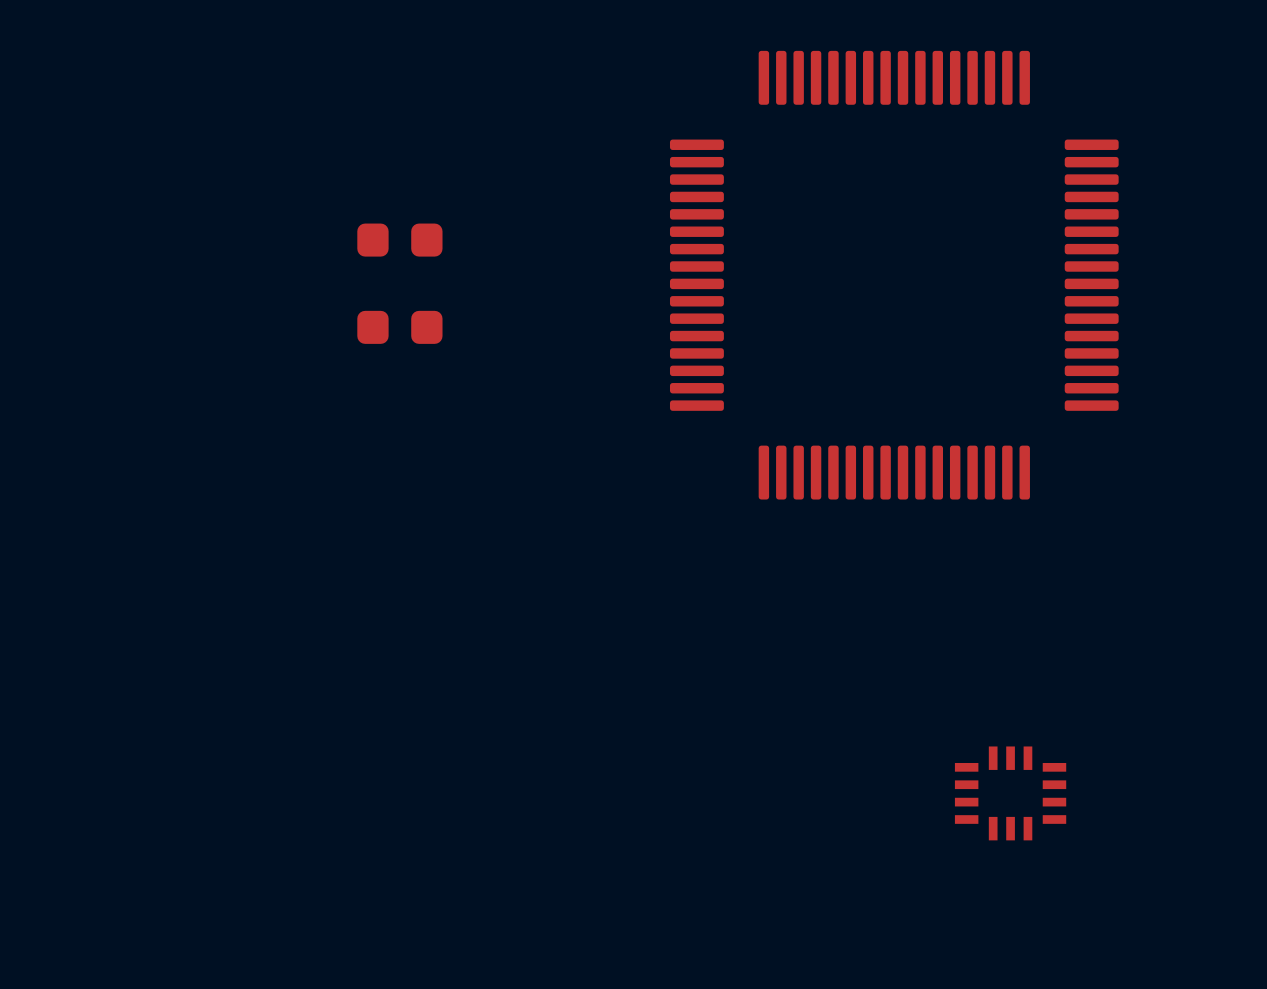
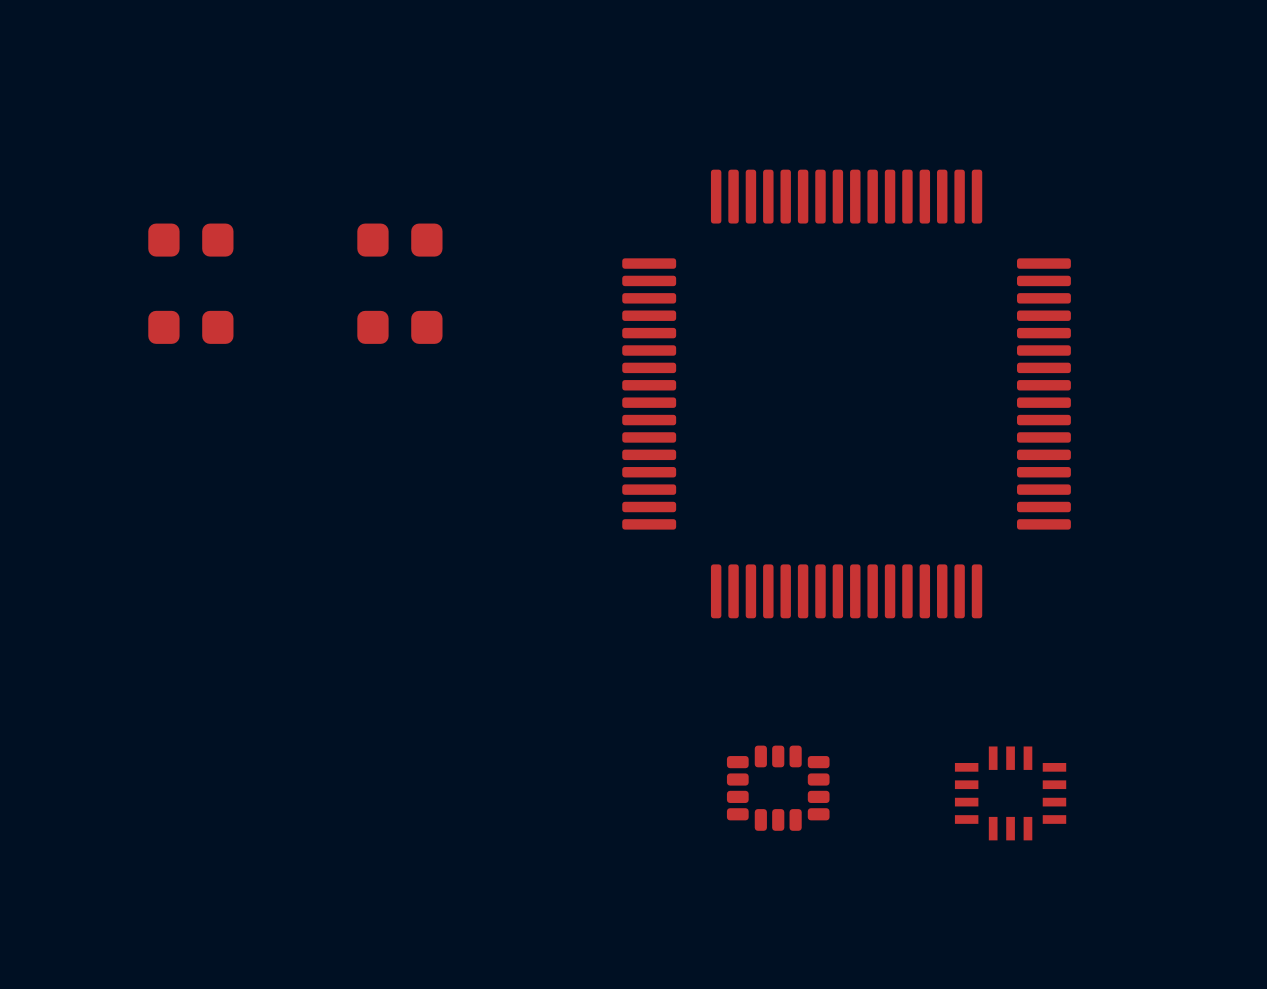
part: none -> (190, 240)
part position: (894, 275) -> (846, 393)
part: none -> (190, 327)
part: none -> (778, 788)

